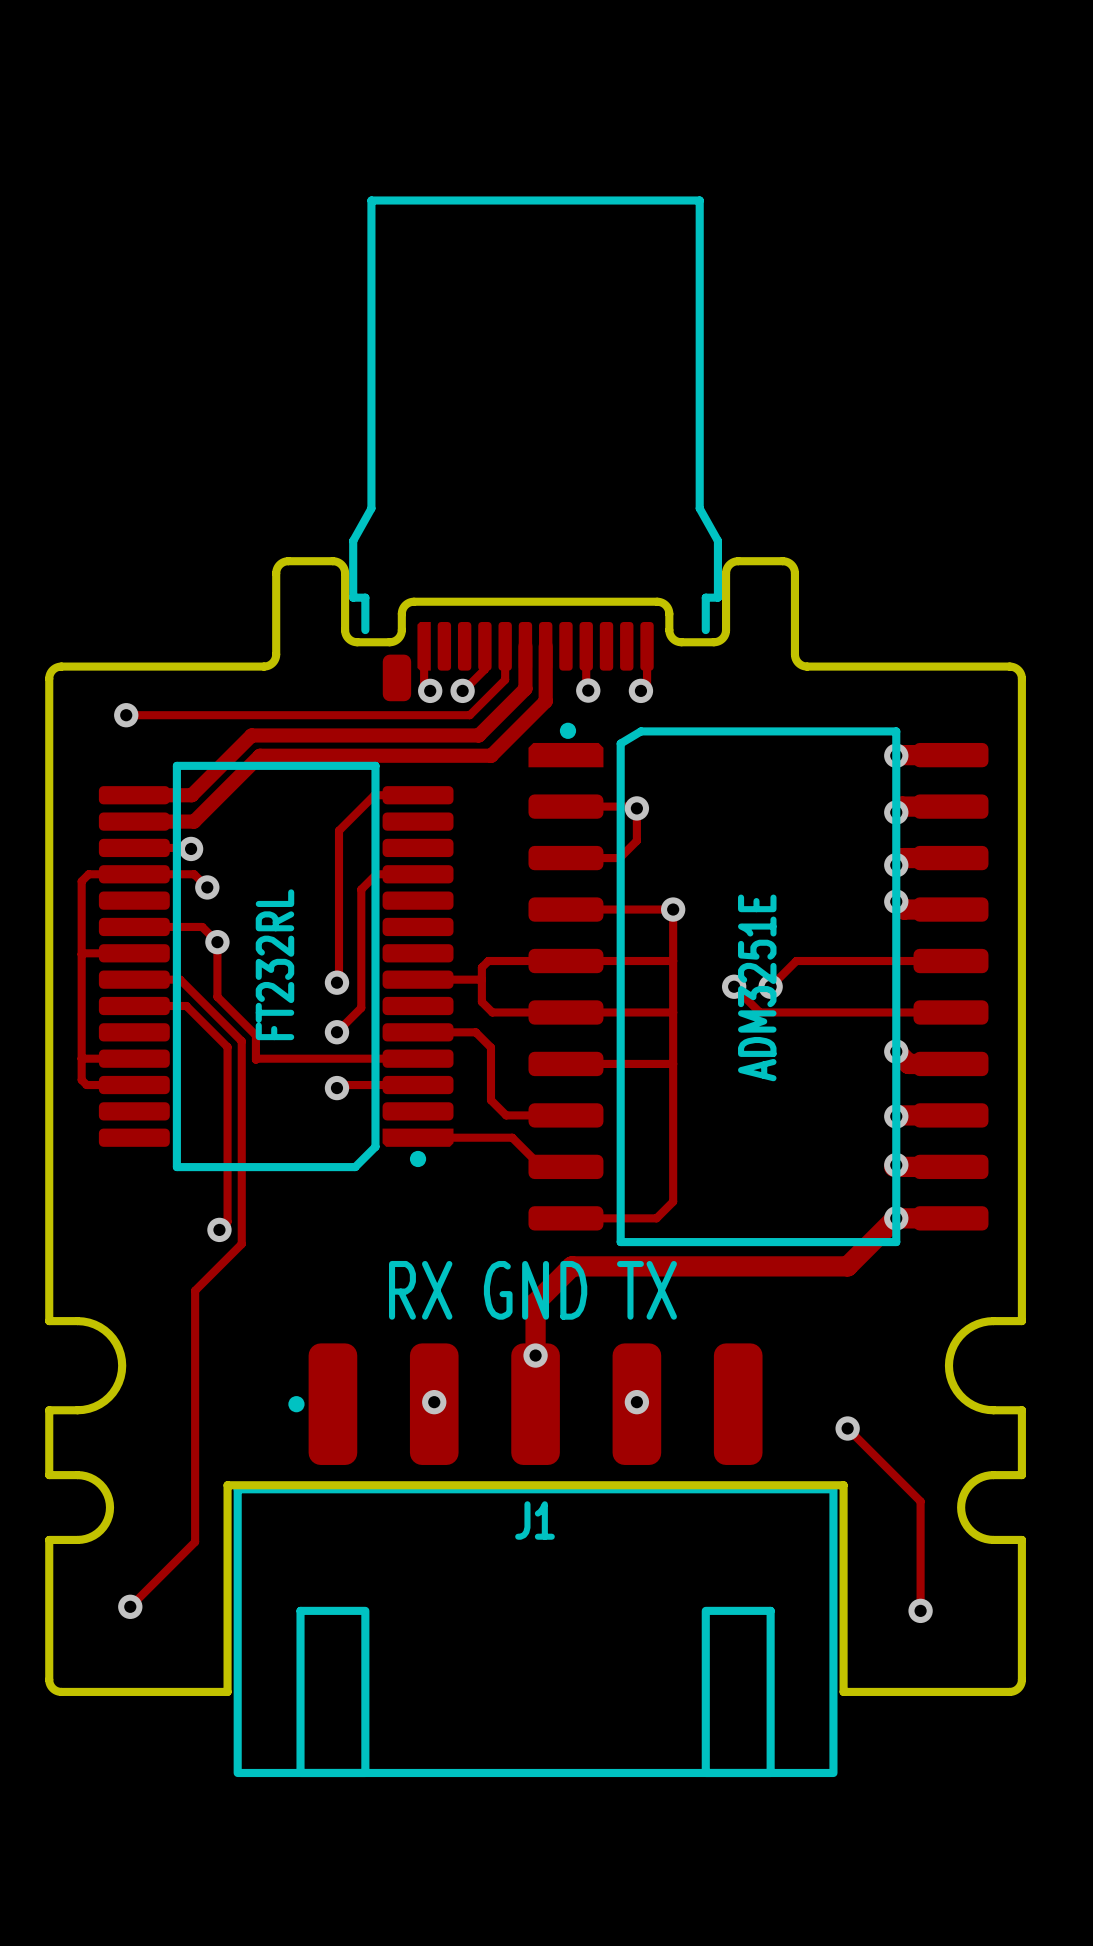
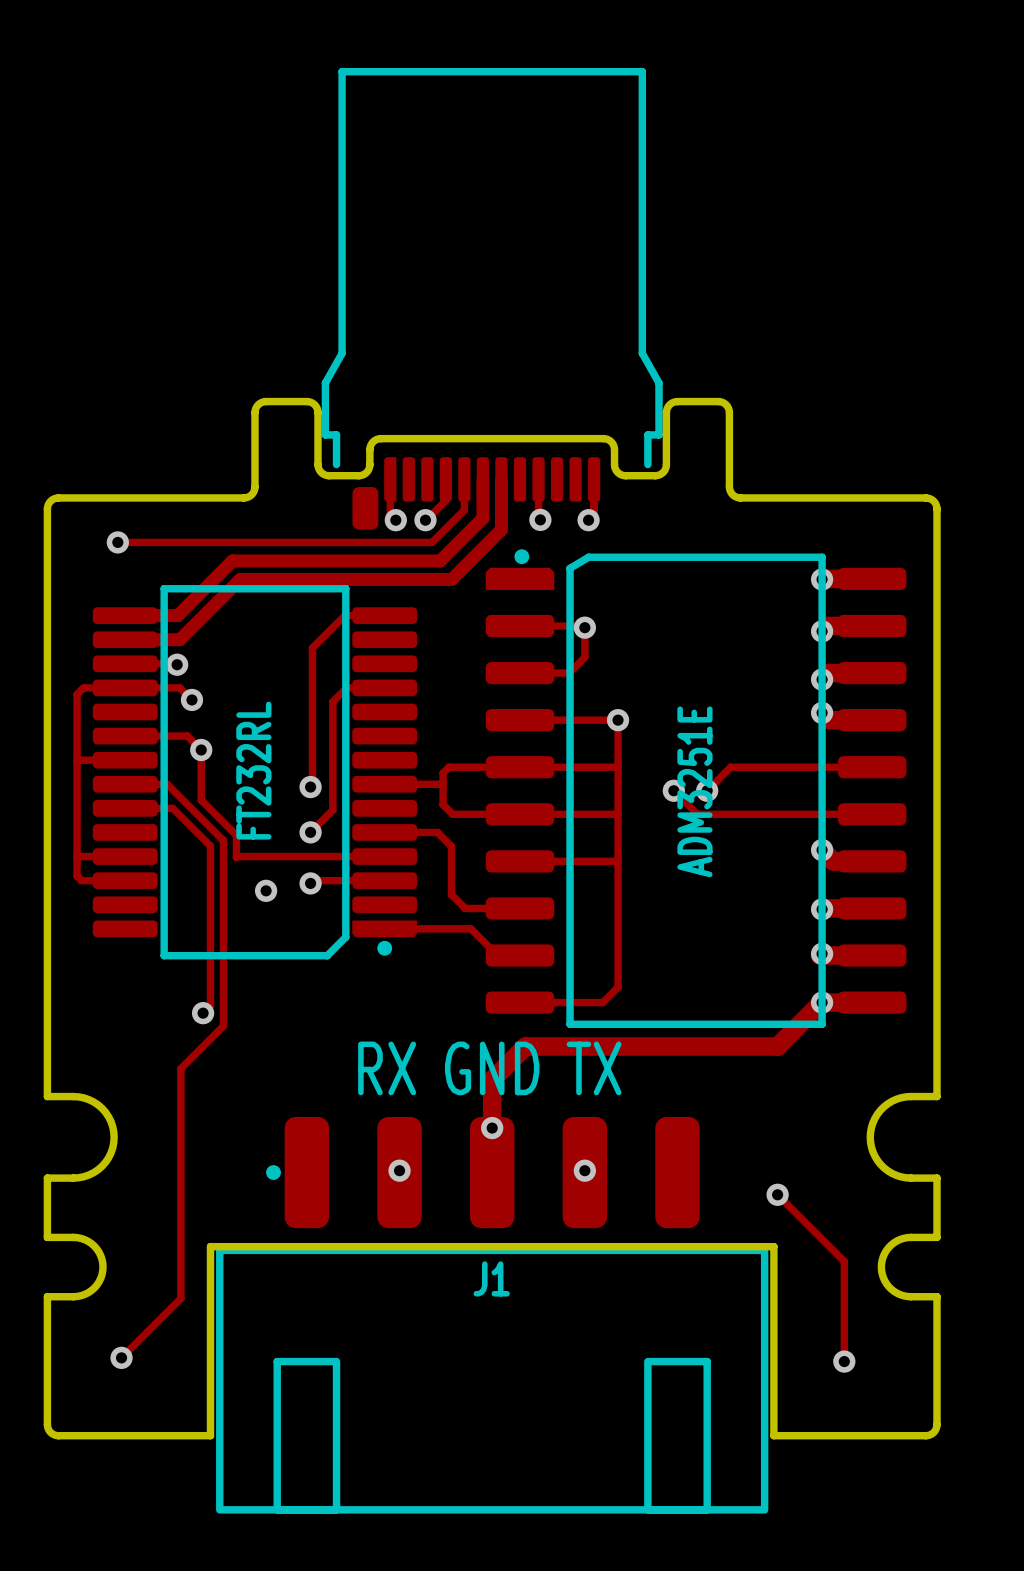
via: none -> (266, 890)

